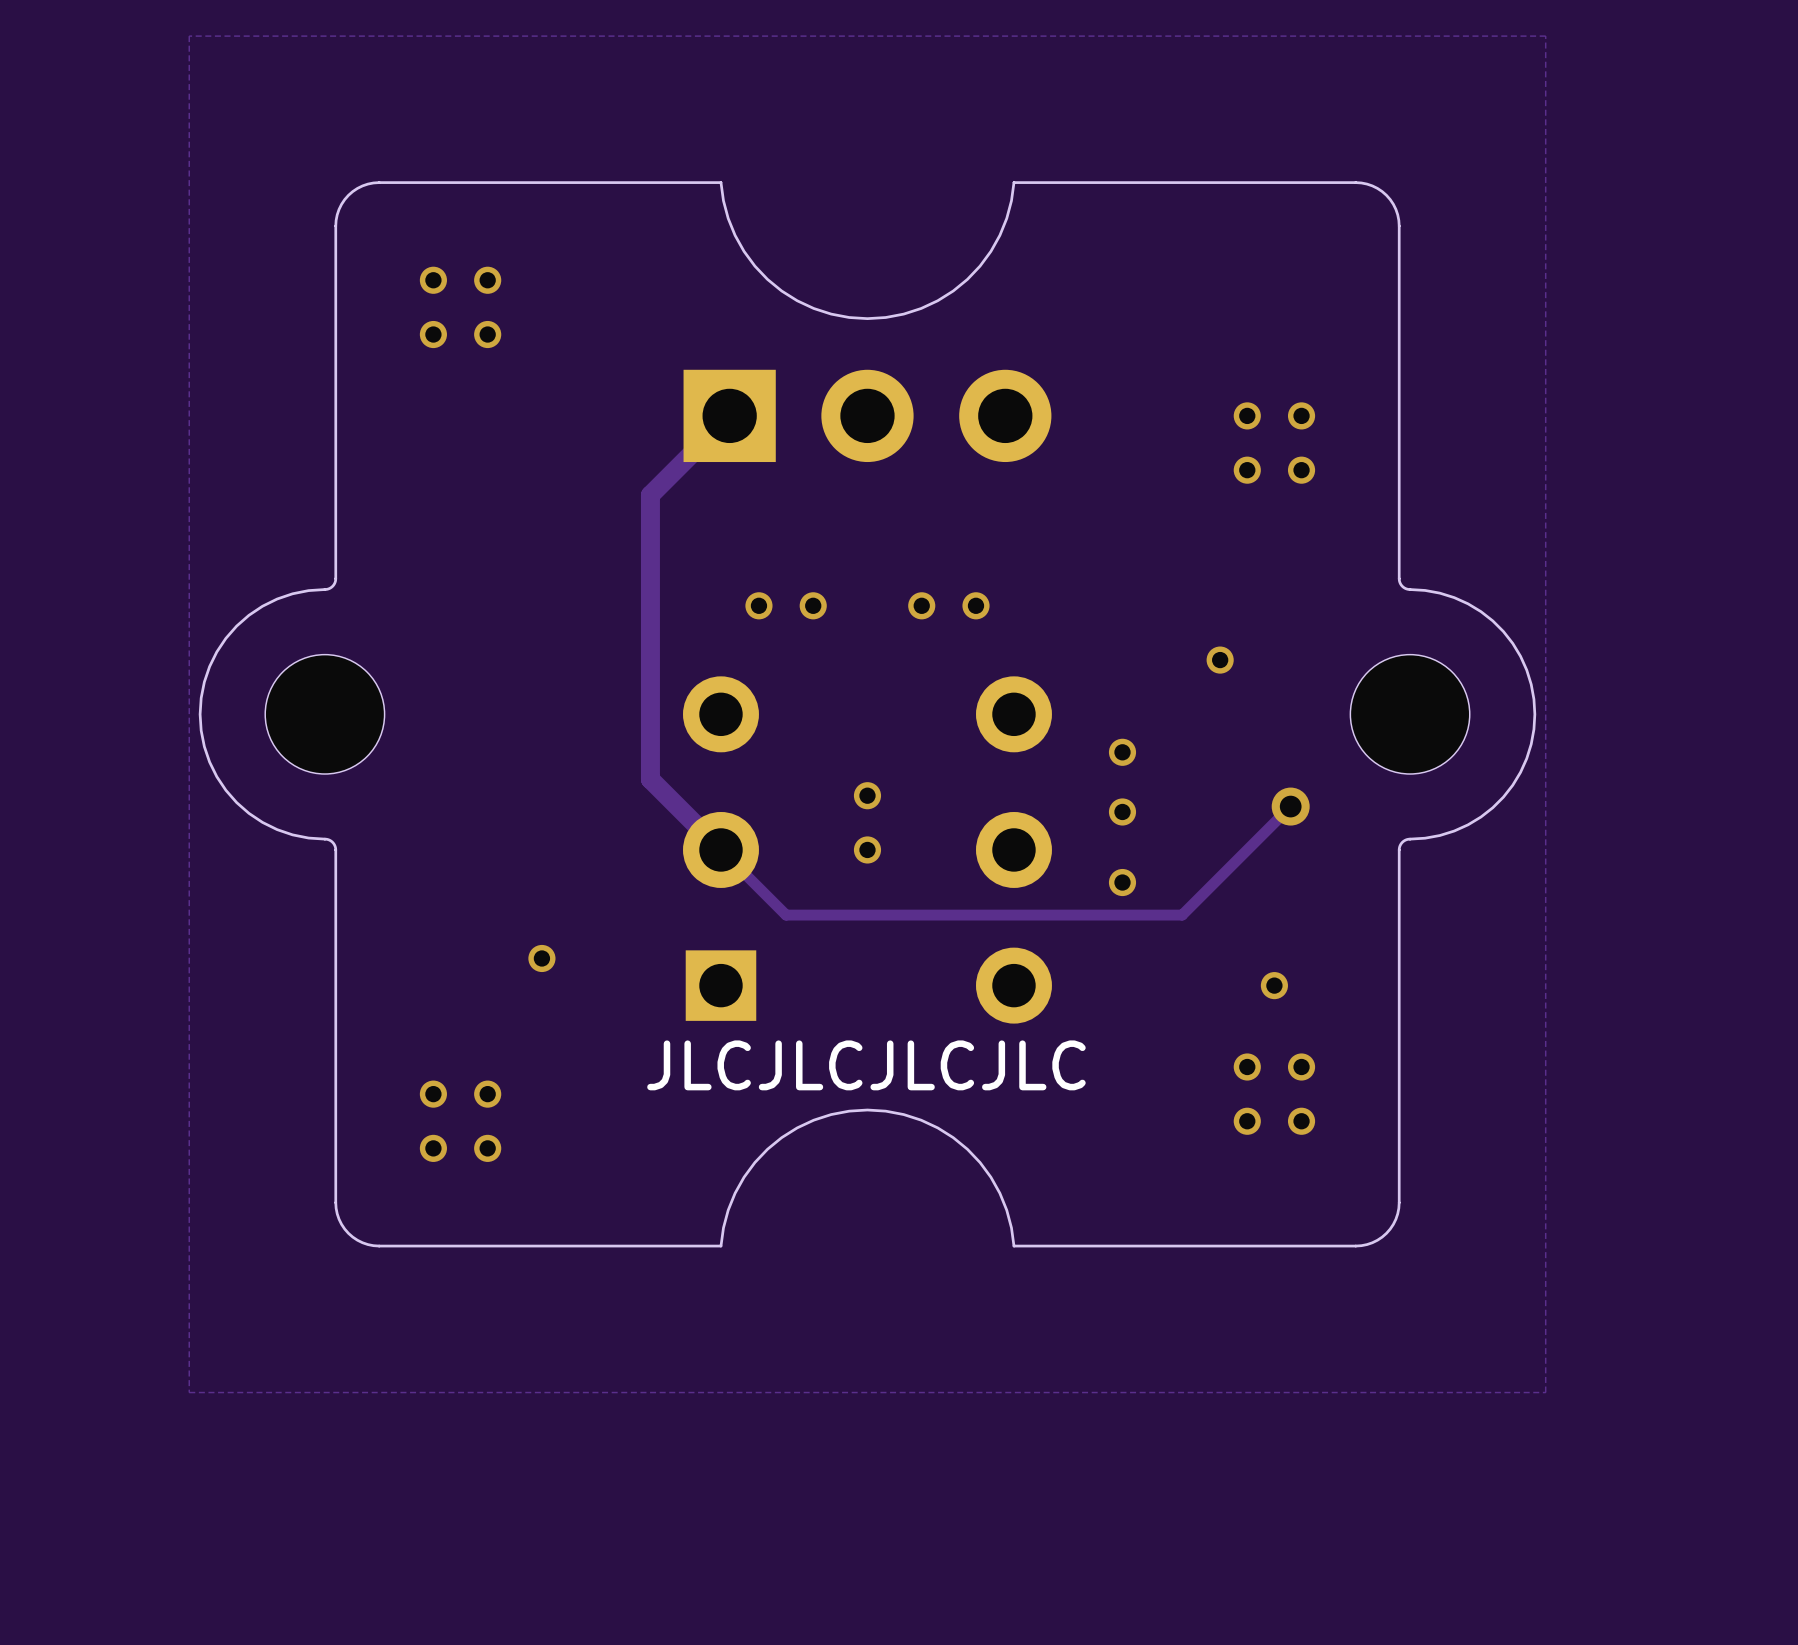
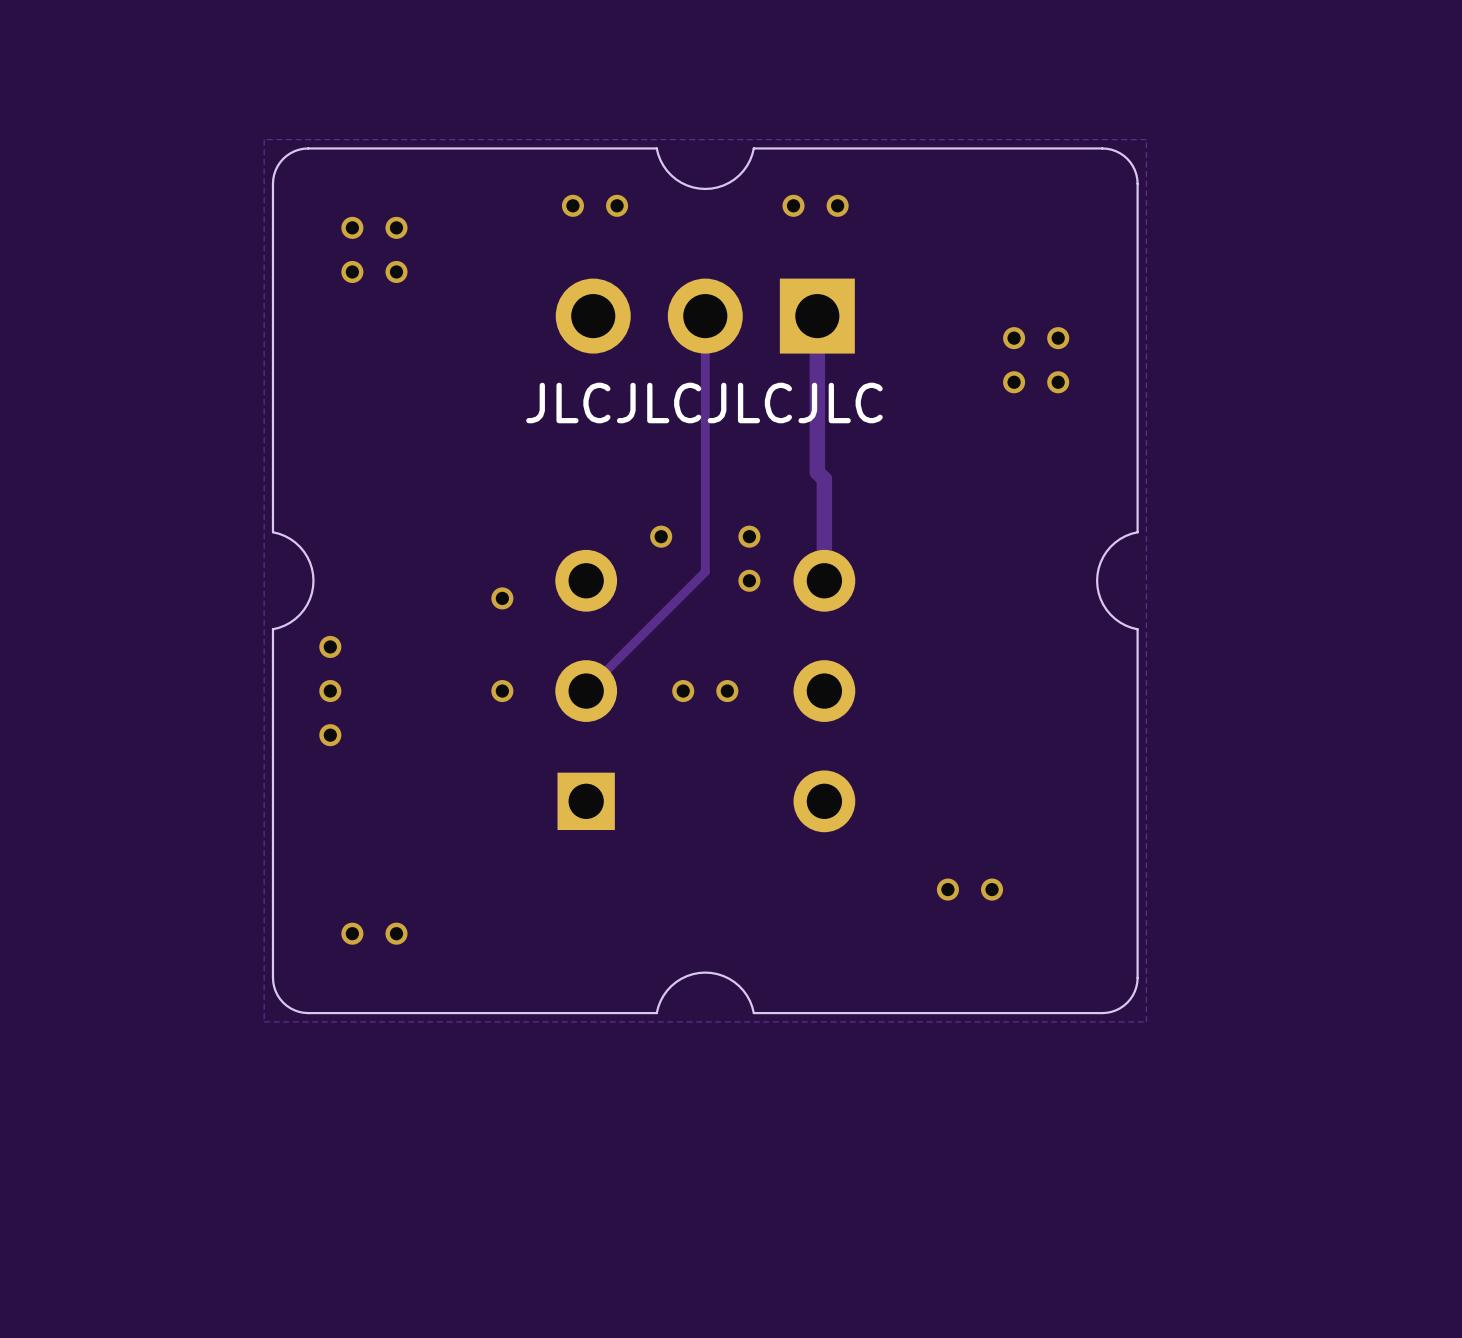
zone outline: (1545, 36) (1545, 1392) (189, 1392) (189, 36) (1545, 36) -> (1146, 139) (1146, 1021) (264, 1021) (264, 139) (1146, 139)
board edge: (1013, 182) (1006, 218) (999, 235) (980, 266) (967, 279) (953, 290) (921, 308) (903, 314) (867, 318) (831, 314) (813, 308) (797, 300) (767, 279) (754, 266) (735, 235) (728, 218) (720, 182) -> (824, 148) (753, 148) (747, 165) (734, 179) (717, 187) (705, 188) (687, 185) (671, 175) (660, 160) (656, 148) (586, 148)
via: none -> (572, 205)
via: none -> (617, 205)
via: none -> (793, 205)
via: none -> (837, 205)
track: none -> (705, 316) (705, 571) (586, 691)
track: none -> (817, 316) (817, 472) (824, 479) (824, 580)
track: (729, 415) (650, 495) (650, 779) (786, 915) (1182, 915) (1290, 806) -> none
part rotation: 0° (867, 415) -> 180° (705, 316)
board edge: (335, 578) (333, 585) (328, 588) (308, 590) (277, 599) (248, 615) (236, 626) (216, 651) (209, 666) (201, 698) (200, 714) (201, 730) (209, 762) (216, 776) (236, 802) (248, 813) (277, 829) (308, 838) (328, 839) (333, 843) (335, 849) -> (272, 470) (272, 532) (290, 538) (303, 551) (309, 562) (313, 580) (311, 593) (303, 609) (290, 622) (272, 629) (272, 691)
board edge: (1399, 578) (1400, 584) (1405, 588) (1439, 593) (1468, 603) (1480, 611) (1503, 631) (1520, 656) (1526, 670) (1531, 684) (1534, 714) (1531, 744) (1526, 758) (1520, 772) (1503, 797) (1480, 817) (1468, 824) (1439, 835) (1405, 839) (1401, 843) (1399, 849) -> (1137, 470) (1137, 532) (1120, 538) (1106, 551) (1098, 568) (1097, 580) (1098, 593) (1106, 609) (1120, 622) (1137, 629) (1137, 691)
via: (758, 605) -> none
via: (813, 605) -> none
via: (921, 605) -> none
via: (976, 605) -> none
via: none -> (661, 536)
via: none -> (749, 536)
via: (1220, 660) -> none
part: (324, 714) -> none
via: none -> (749, 580)
part: (1410, 714) -> none
via: none -> (502, 598)
via: (1122, 752) -> none
via: none -> (330, 646)
via: (867, 795) -> none
via: (1290, 806) -> none
via: (1122, 811) -> none
via: none -> (330, 691)
via: none -> (502, 691)
via: none -> (683, 691)
via: (867, 849) -> none
via: none -> (727, 691)
via: (1122, 882) -> none
via: none -> (330, 735)
via: (541, 958) -> none
via: (1274, 985) -> none
text position: JLCJLCJLCJLC (866, 1065) -> JLCJLCJLCJLC (704, 402)
via: (1247, 1067) -> none
via: (1301, 1067) -> none
via: (433, 1094) -> none
via: (487, 1094) -> none
via: none -> (947, 889)
via: none -> (992, 889)
via: (1247, 1121) -> none
via: (1301, 1121) -> none
board edge: (1013, 1246) (1006, 1210) (999, 1193) (980, 1162) (967, 1149) (953, 1137) (921, 1120) (885, 1111) (867, 1110) (849, 1111) (813, 1120) (781, 1137) (767, 1149) (754, 1162) (735, 1193) (723, 1227) (720, 1246) -> (824, 1013) (753, 1013) (747, 995) (734, 982) (717, 974) (705, 972) (692, 974) (676, 982) (663, 995) (656, 1013) (586, 1013)

